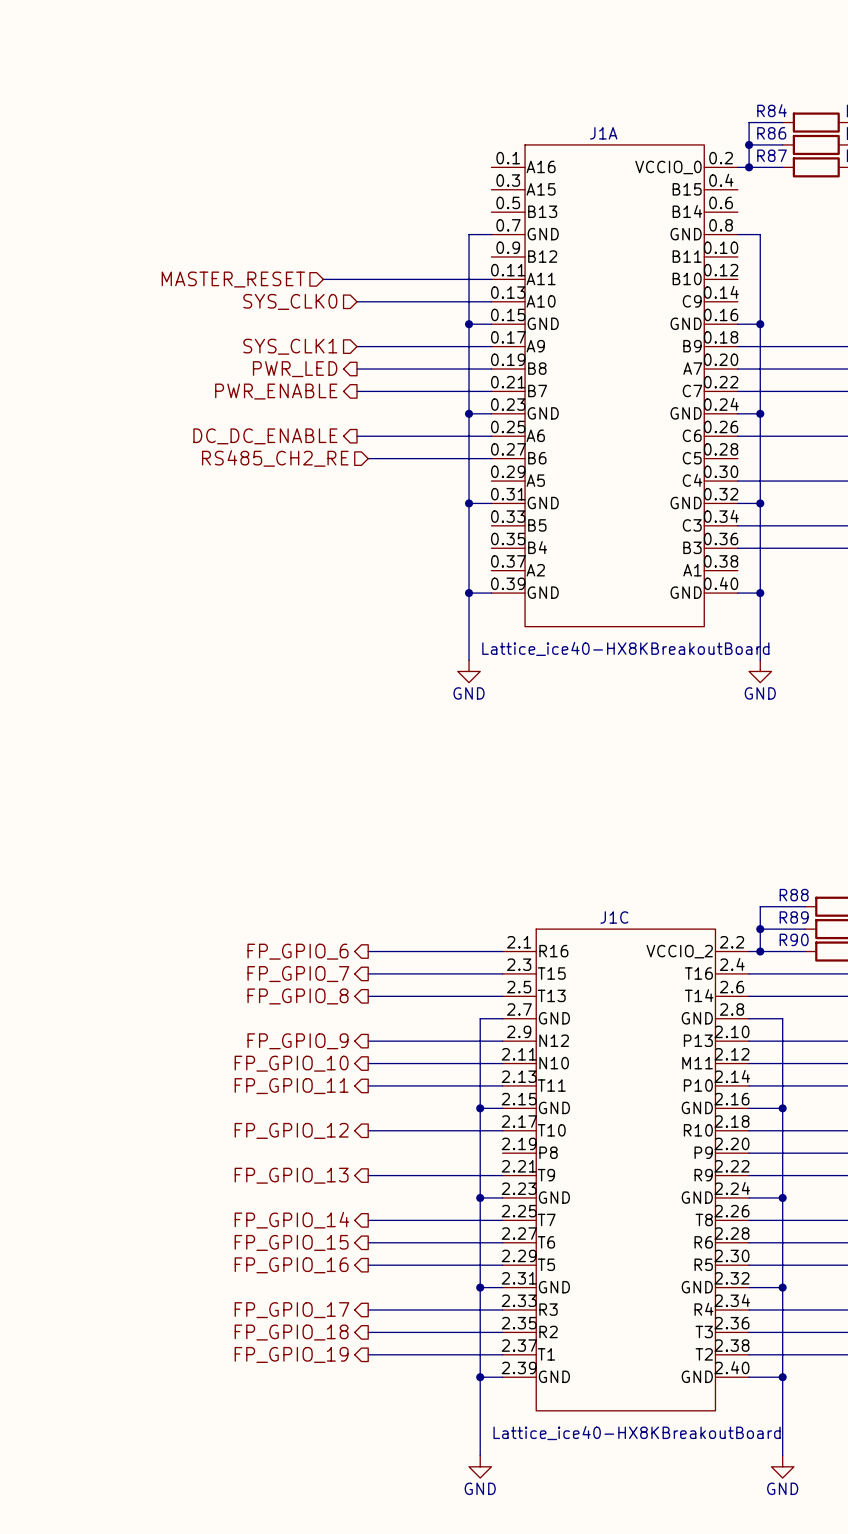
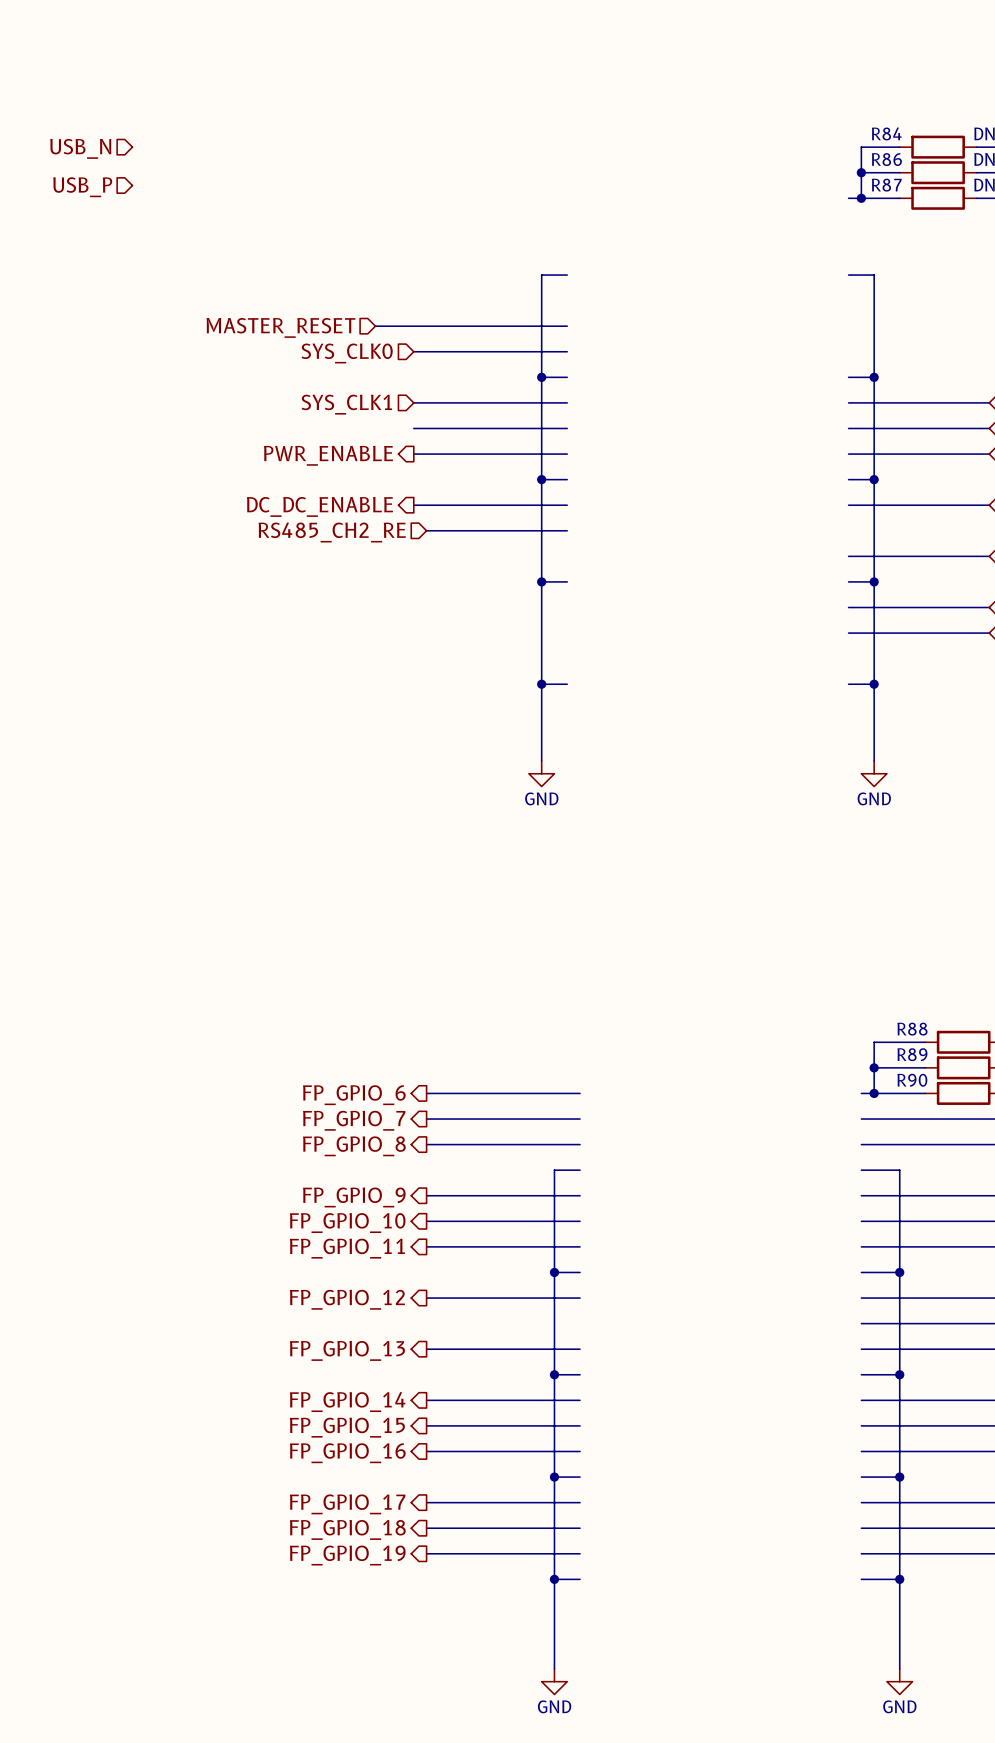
hierarchical label: none -> USB_N (80, 148)
hierarchical label: none -> USB_P (82, 187)
hierarchical label: PWR_LED (295, 369) -> none
J1A: Lattice_ice40-HX8KBreakoutBoard (614, 385) -> none
J1C: Lattice_ice40-HX8KBreakoutBoard (625, 1169) -> none

